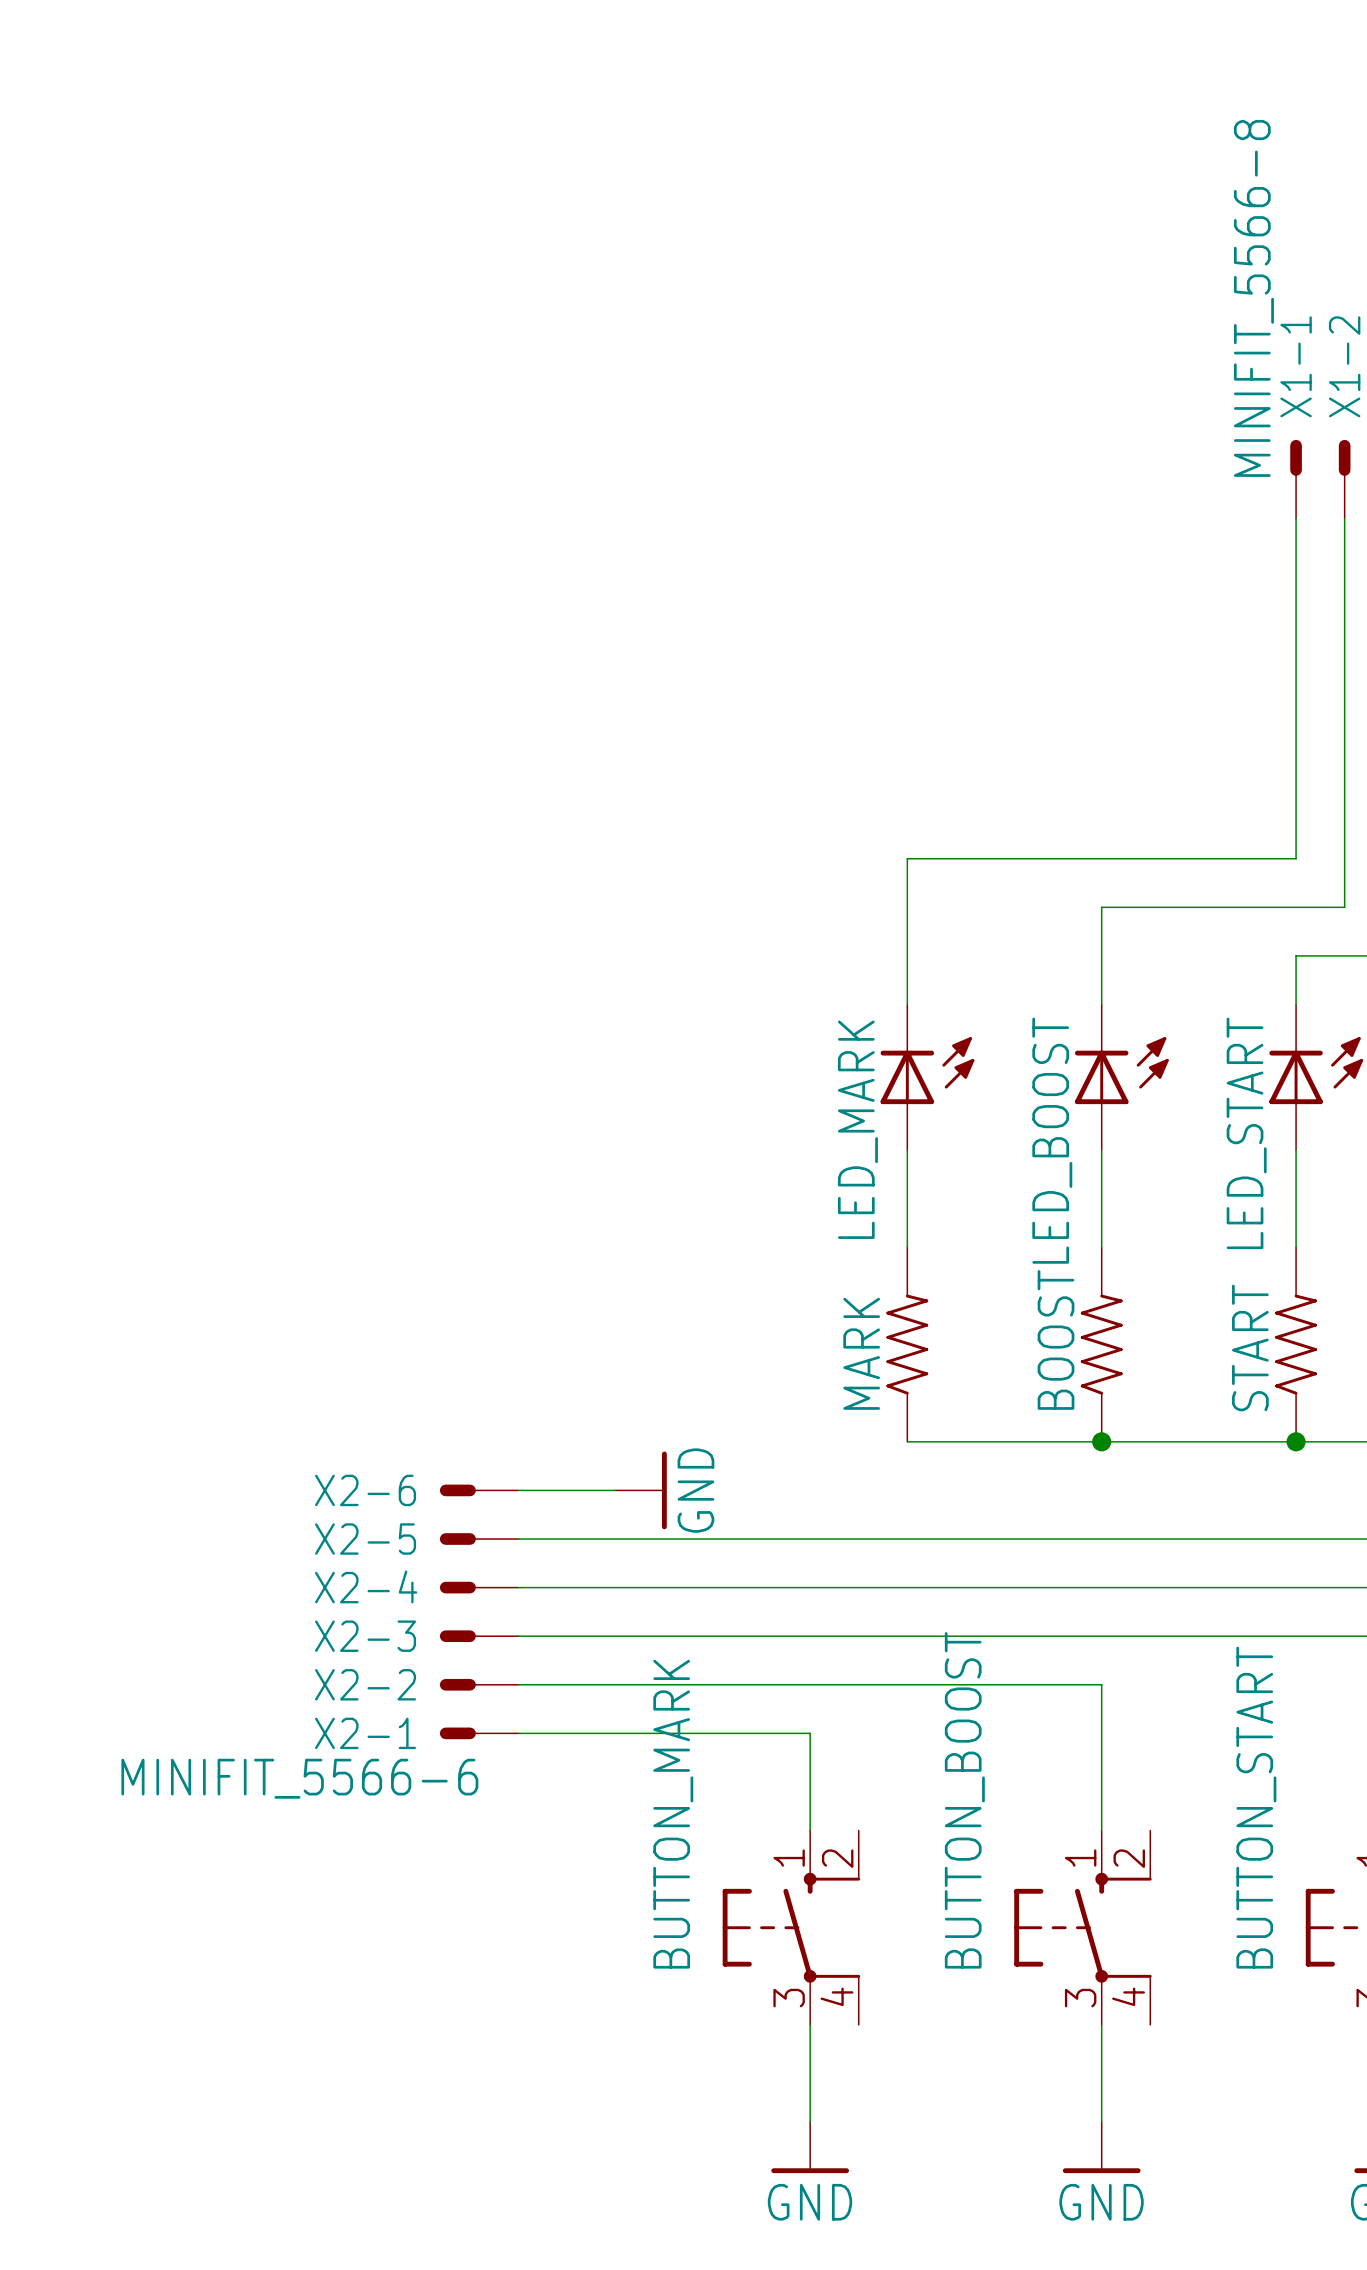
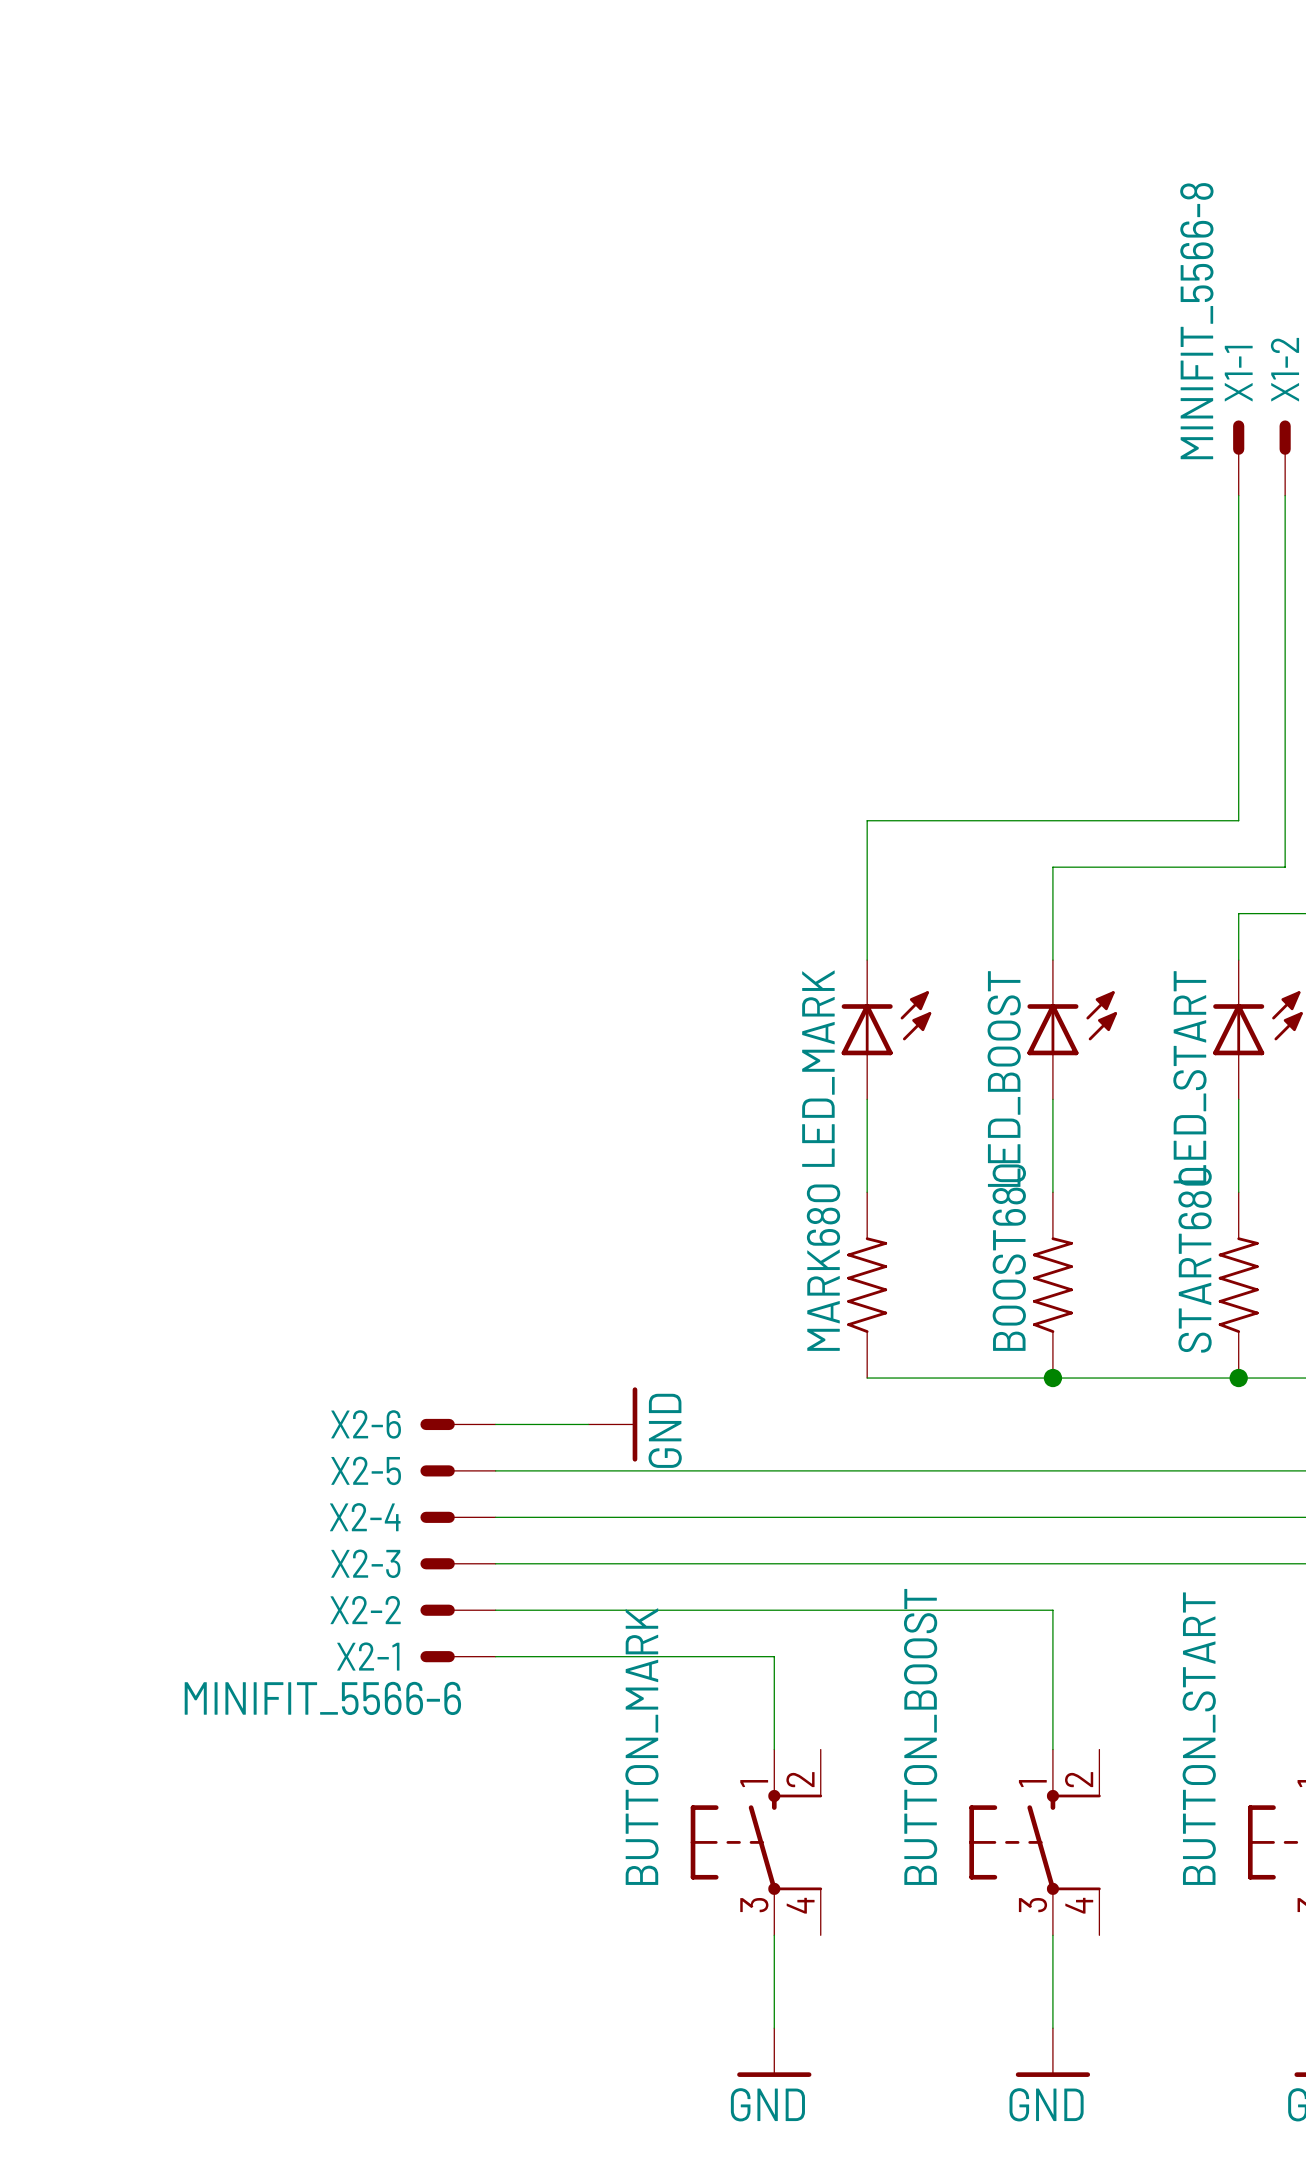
BOOST name: BOOST (1056, 1339) -> BOOST680 (1009, 1257)
START name: START (1250, 1347) -> START680 (1195, 1260)
MARK name: MARK (861, 1353) -> MARK680 (823, 1267)

